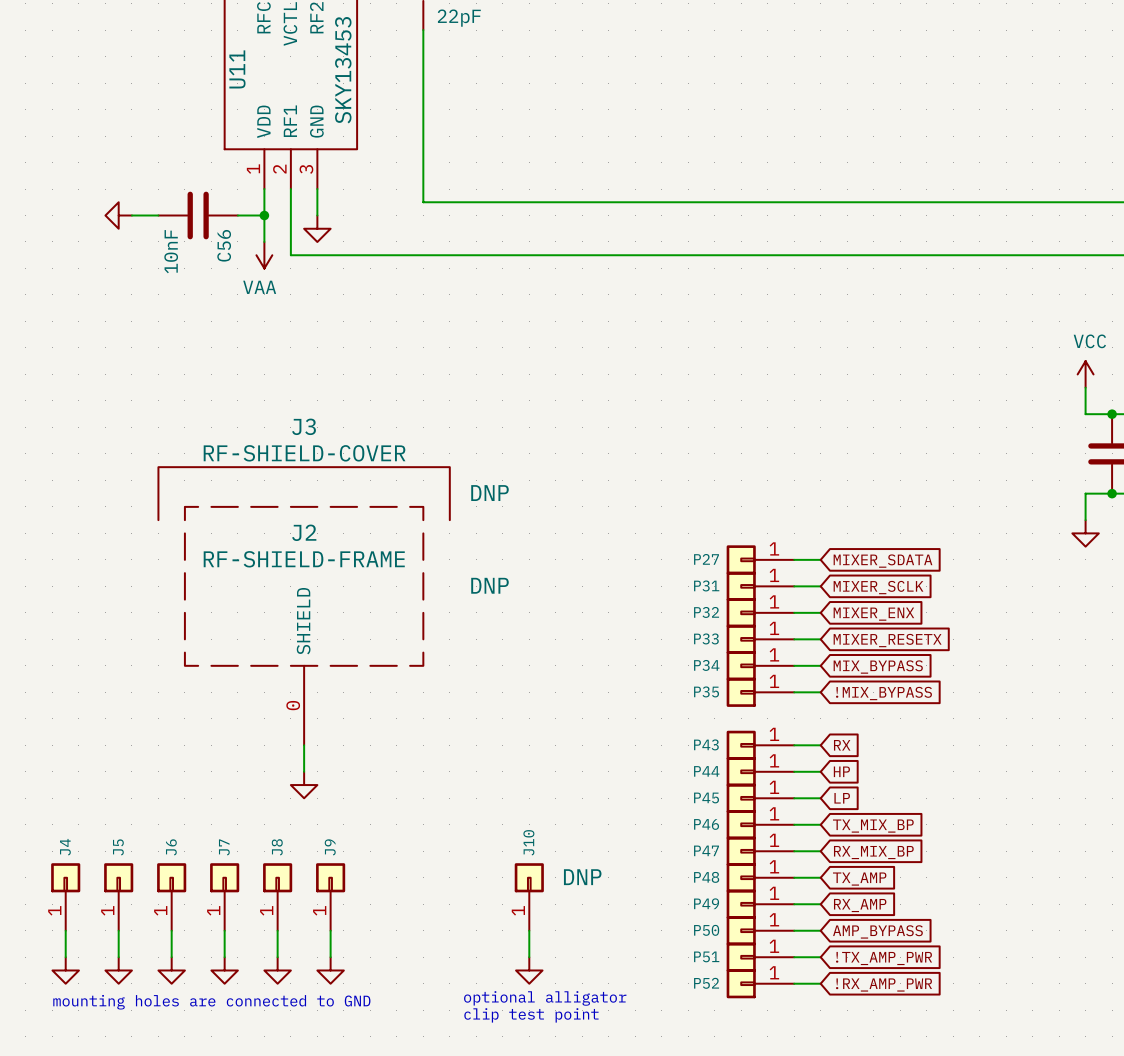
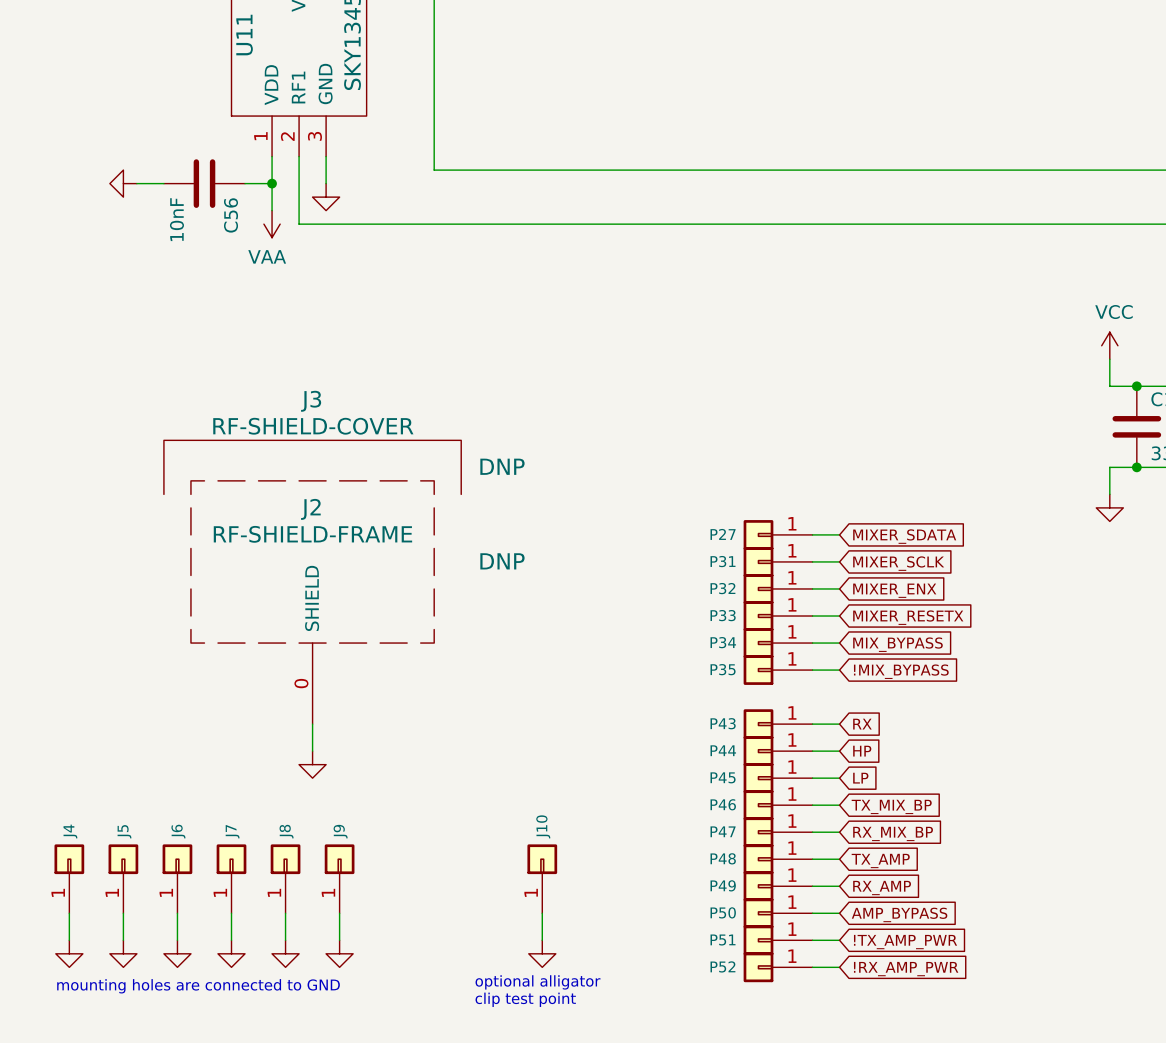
J10 text: DNP (582, 877) -> none

